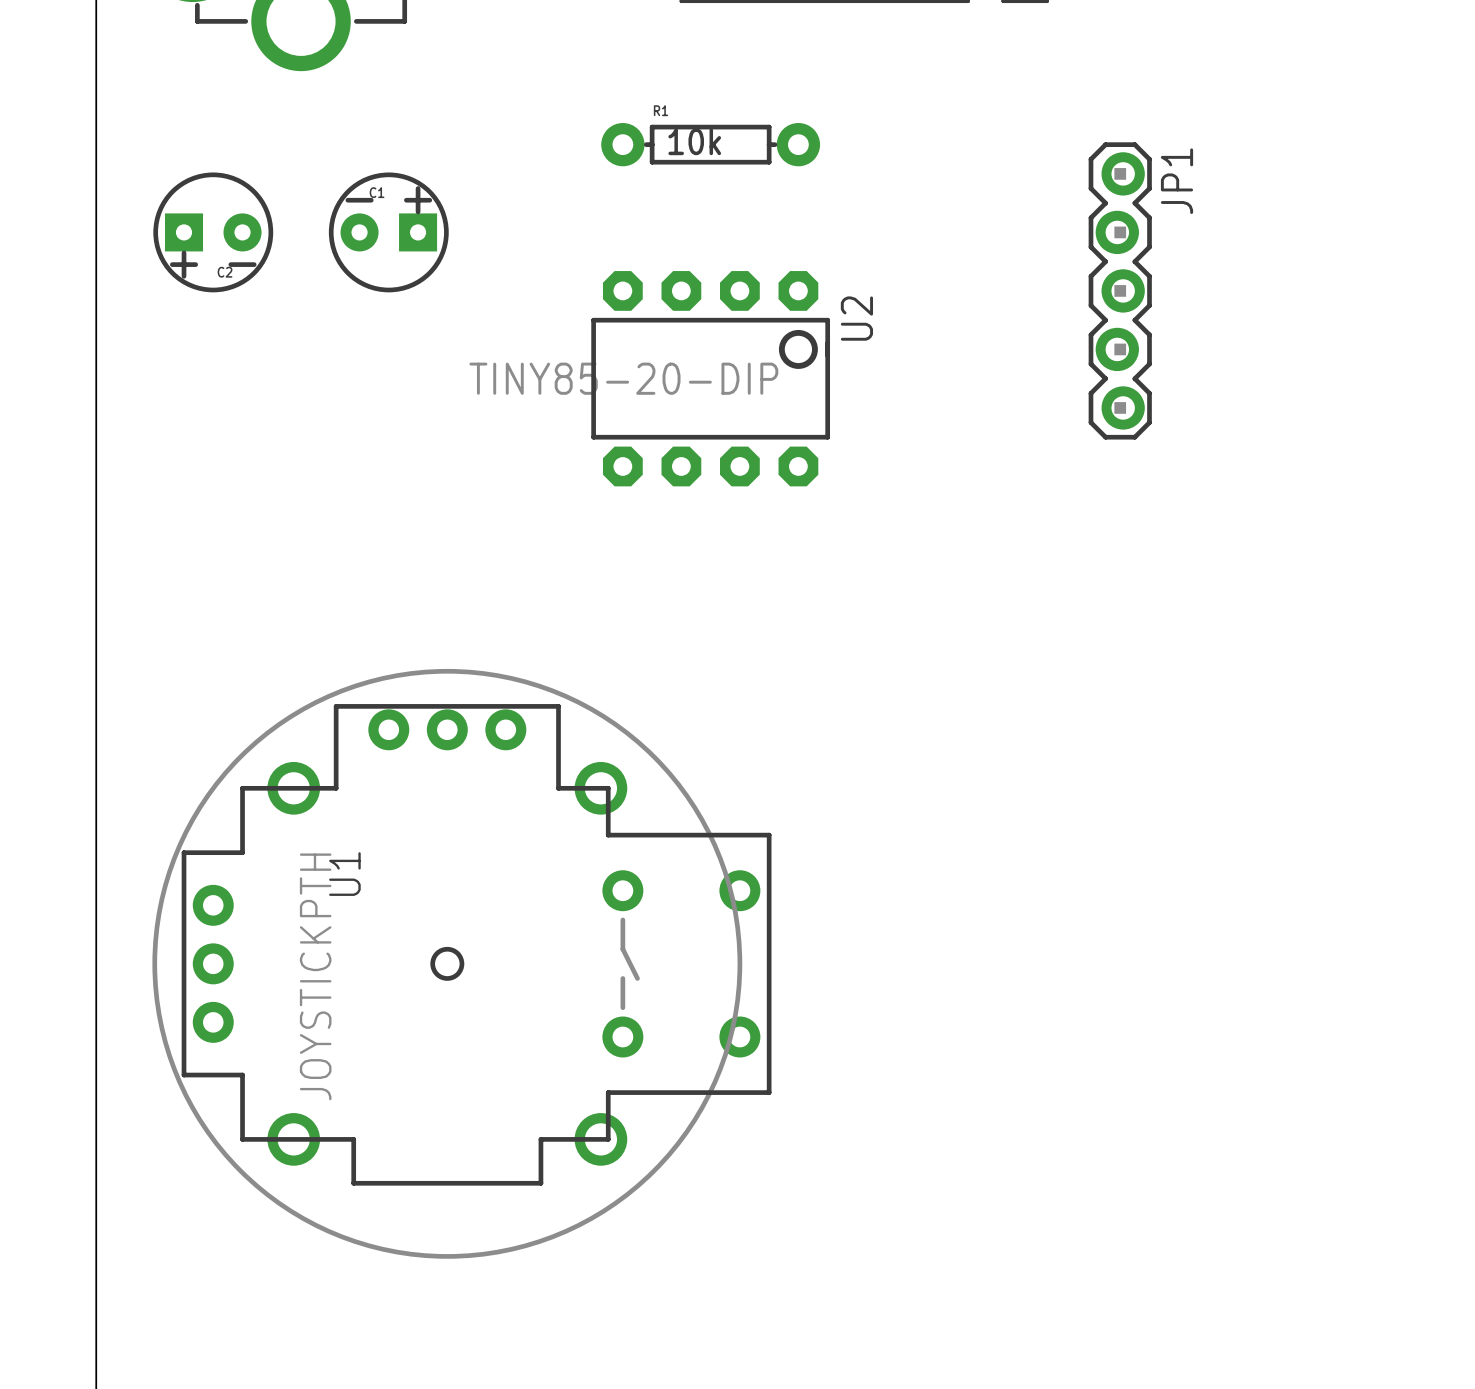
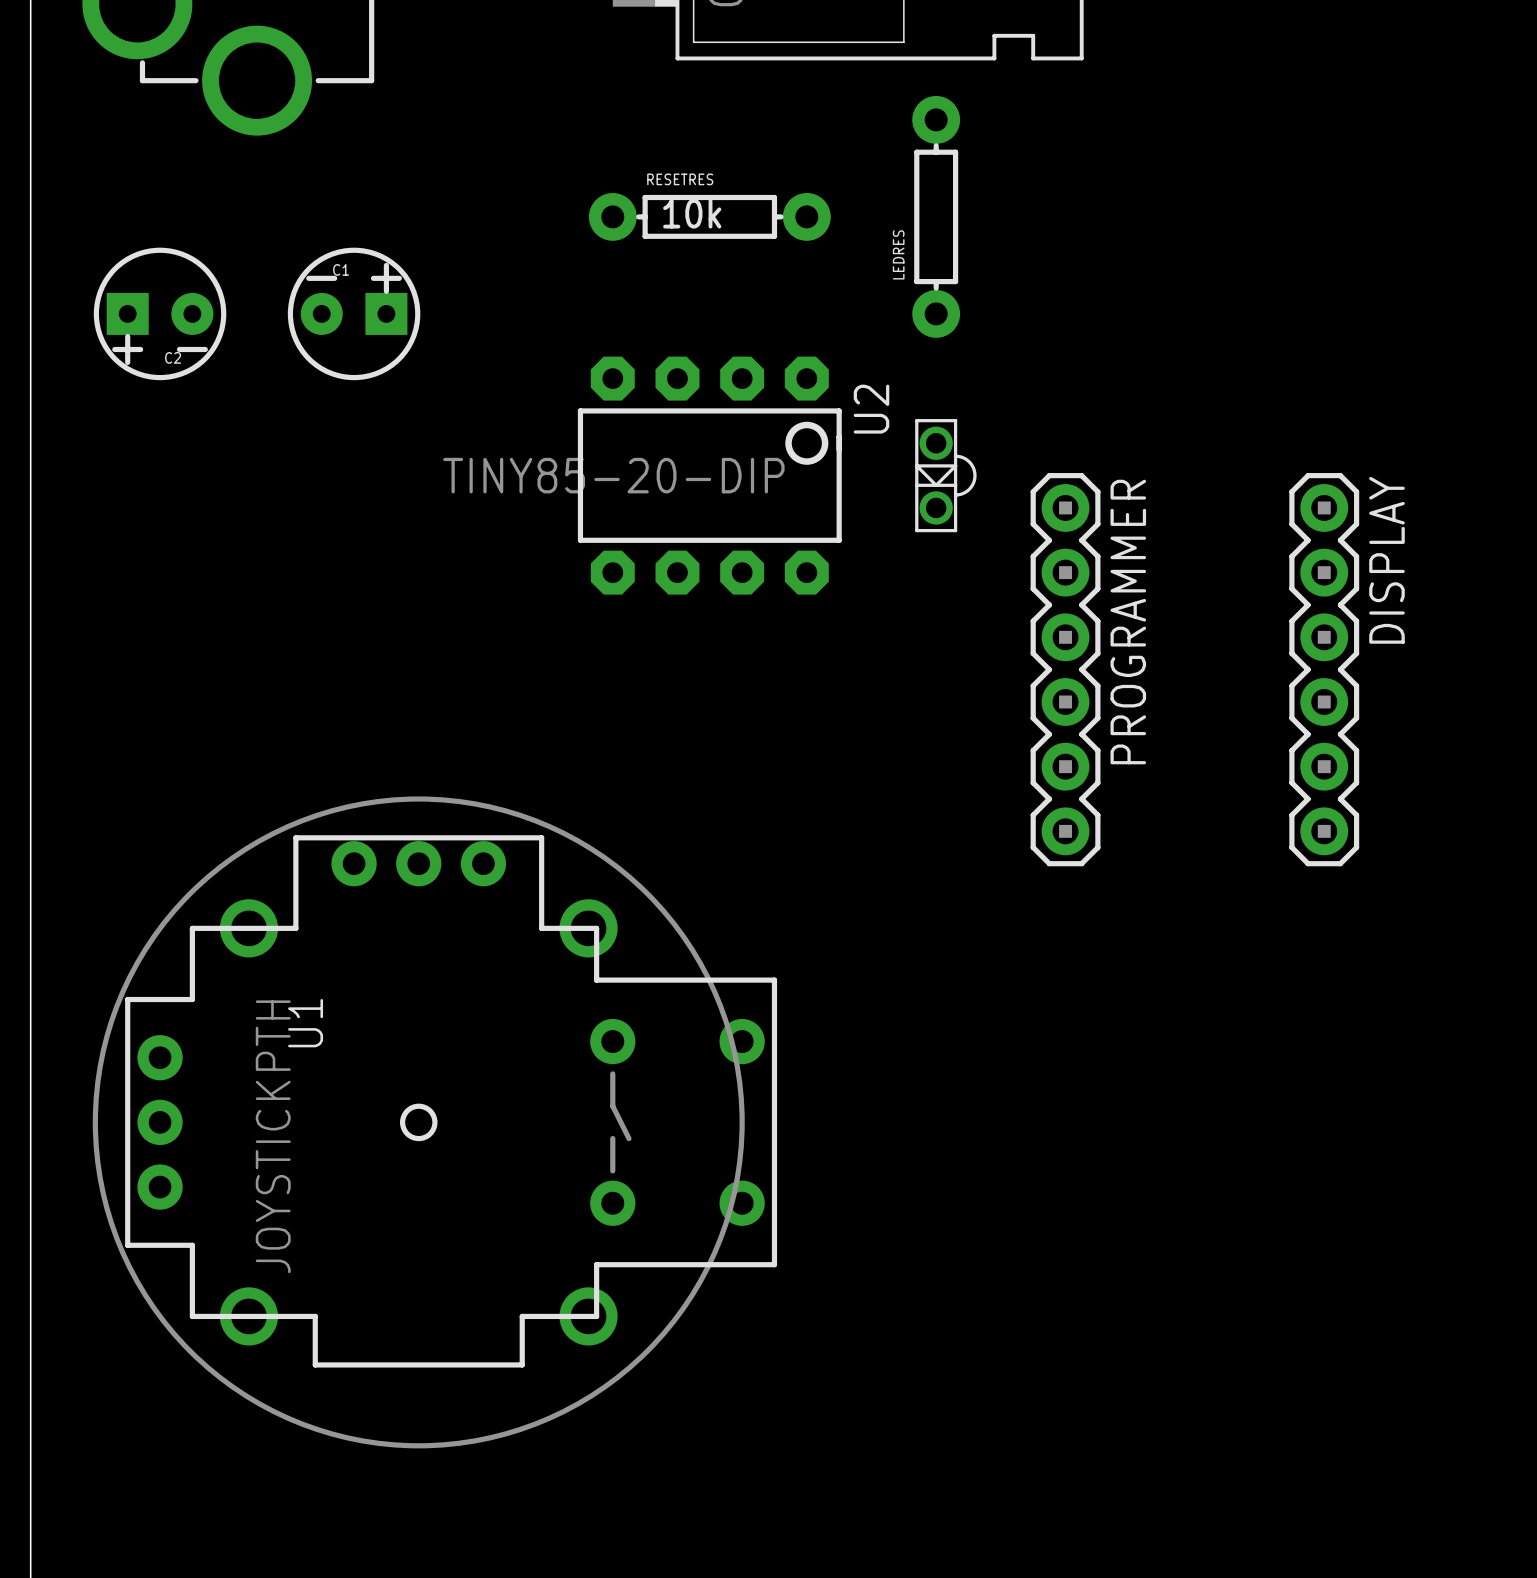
R1 name: R1 (661, 110) -> RESETRES (680, 179)
LEDRES: none -> (936, 216)
JP1: (1120, 290) -> none
part: none -> (945, 475)
PROGRAMMER: none -> (1065, 669)
DISPLAY: none -> (1324, 669)

